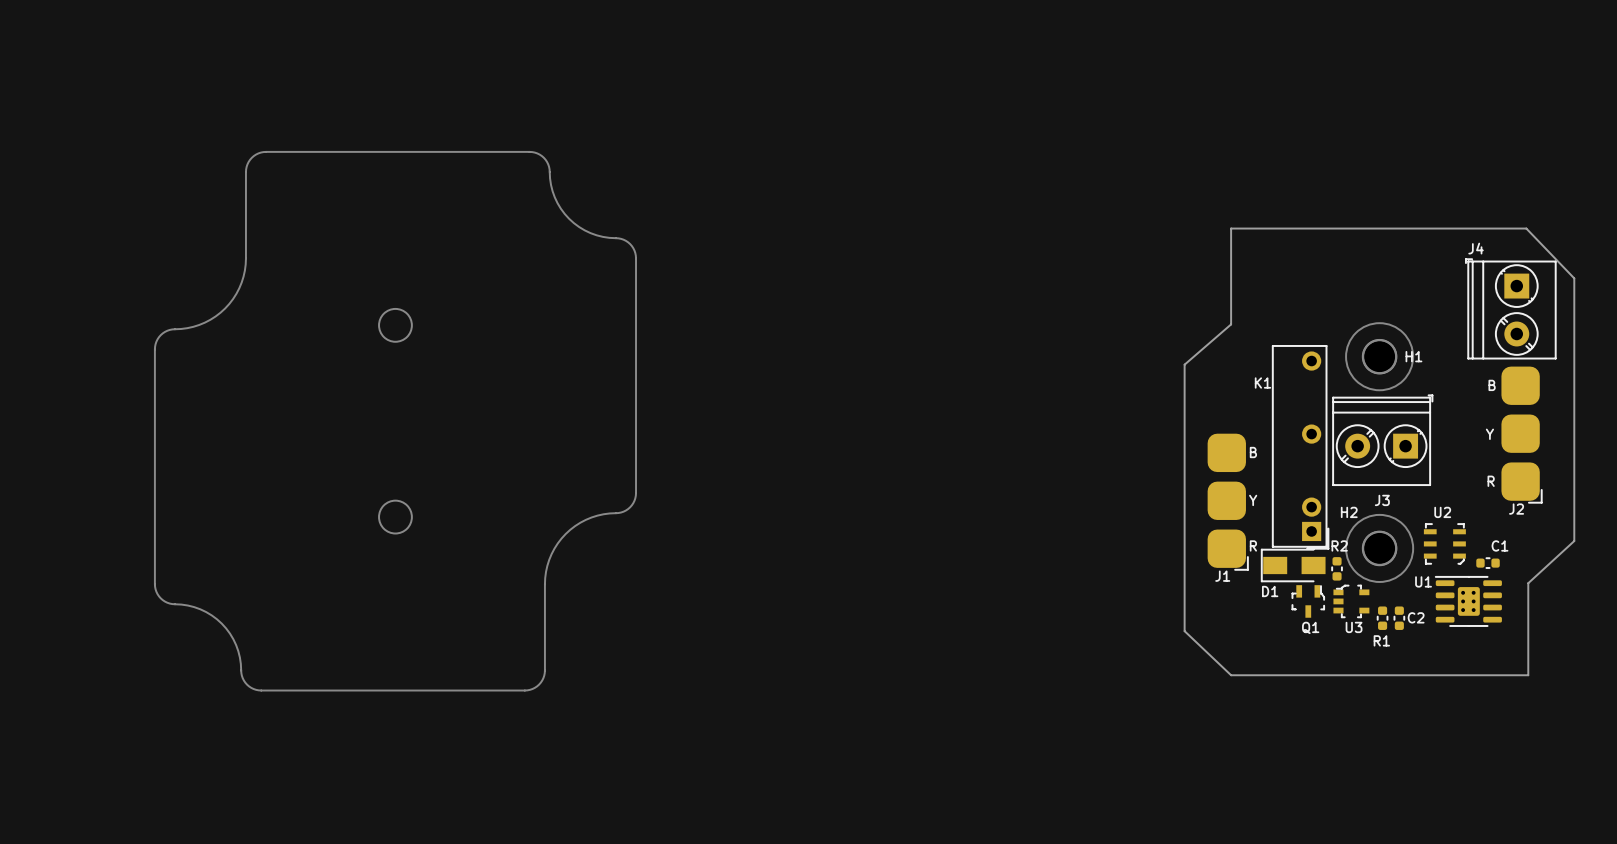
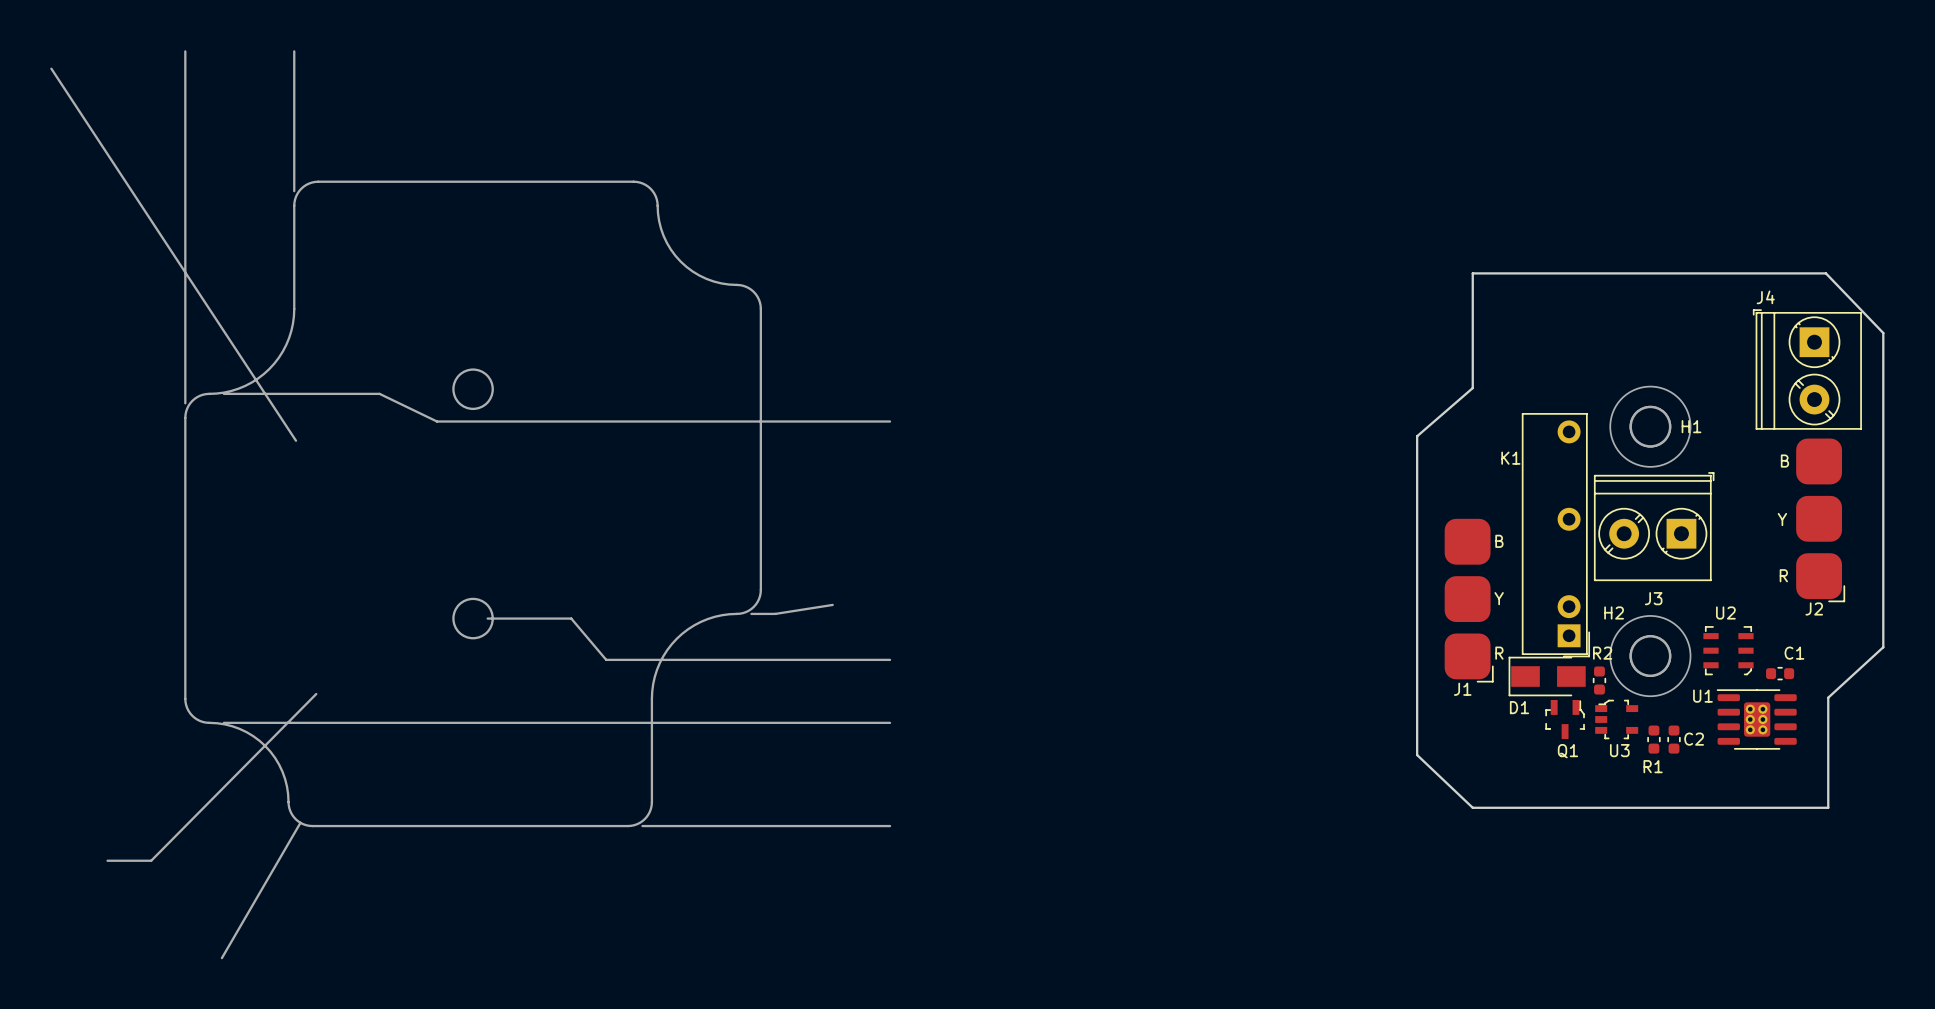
line: none -> (185, 51) (185, 403)
line: none -> (294, 51) (294, 191)
line: none -> (51, 68) (296, 440)
line: none -> (223, 393) (379, 393) (436, 421) (890, 421)
line: none -> (832, 604) (775, 613) (751, 613)
line: none -> (487, 618) (571, 618) (606, 659) (890, 659)
line: none -> (316, 694) (151, 860) (107, 860)
line: none -> (223, 722) (890, 722)
line: none -> (300, 822) (221, 958)
line: none -> (642, 826) (890, 826)

